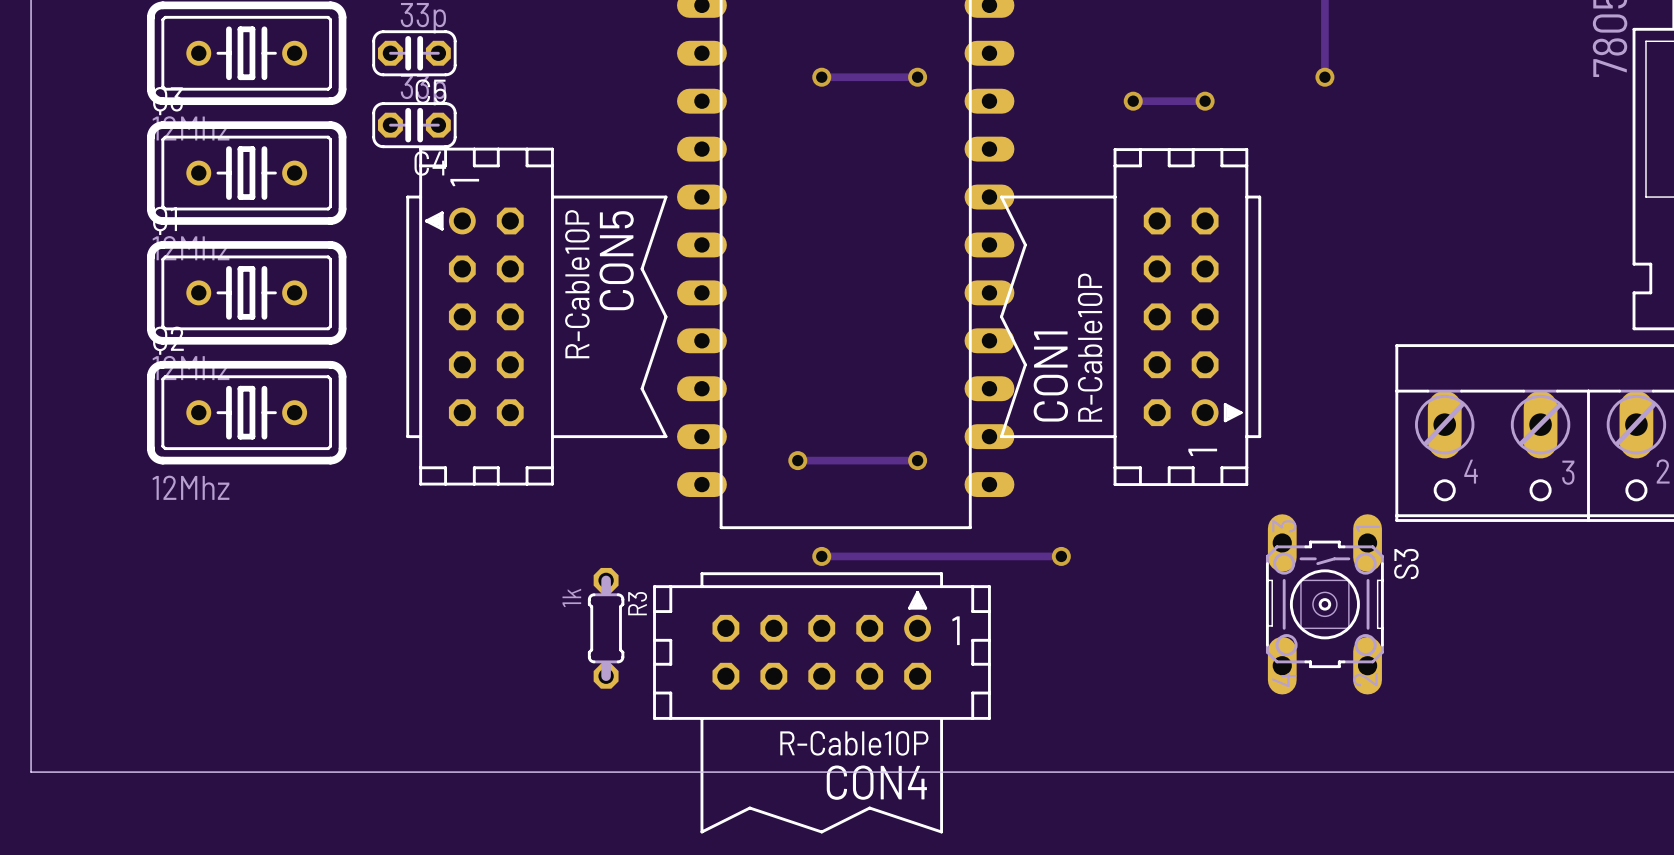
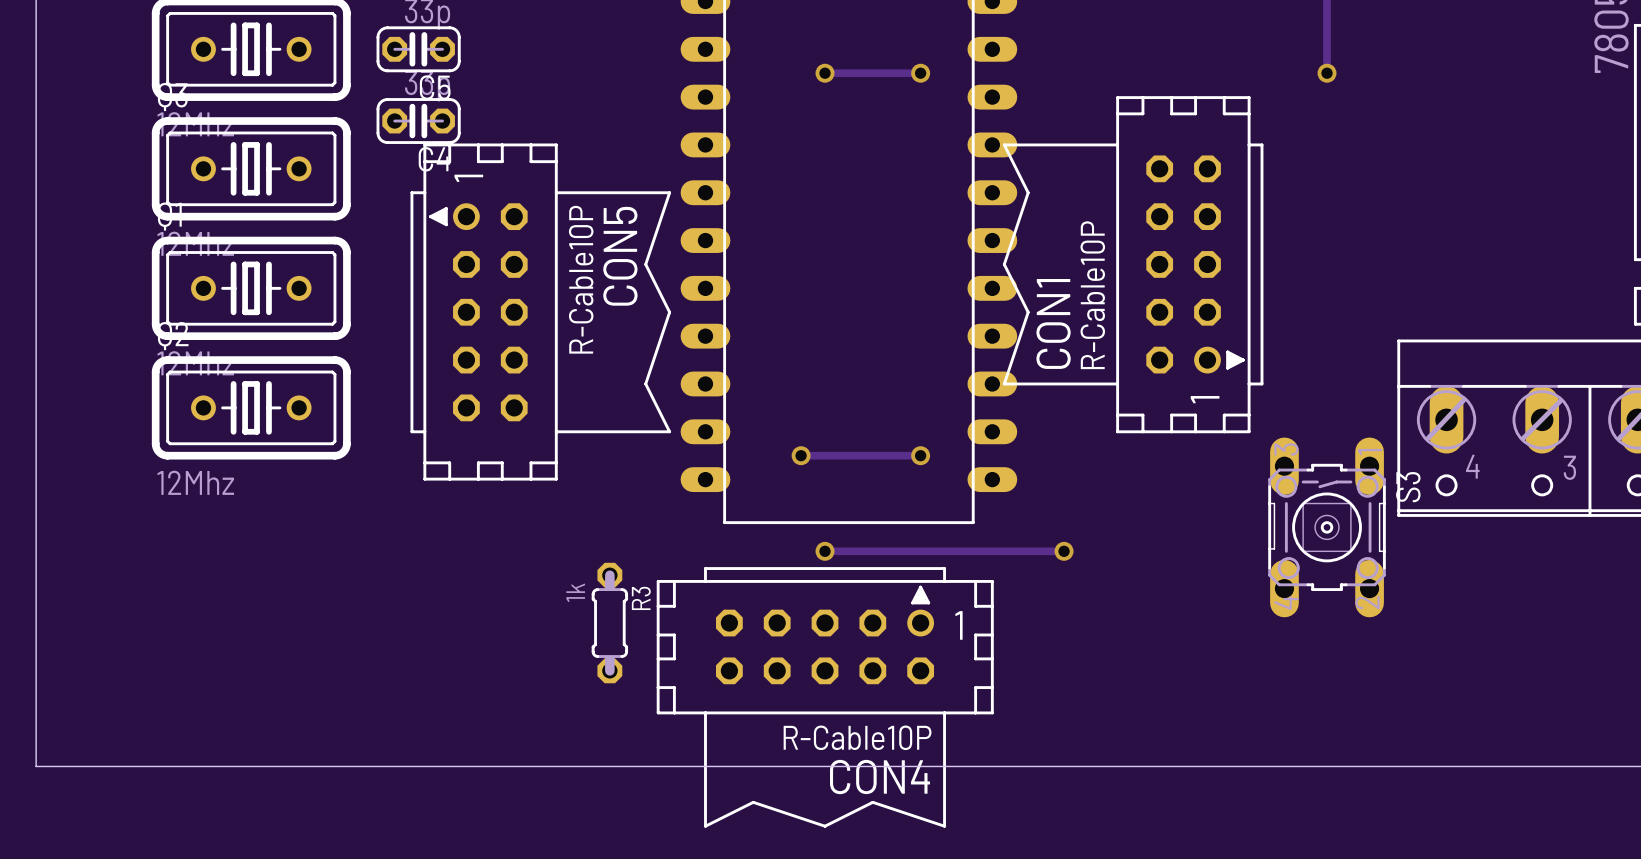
track: (1133, 101) (1205, 101) -> none
via: (1133, 101) -> none
via: (1205, 101) -> none
CON1 position: (1130, 317) -> (1133, 264)
S3 position: (1324, 604) -> (1327, 527)

